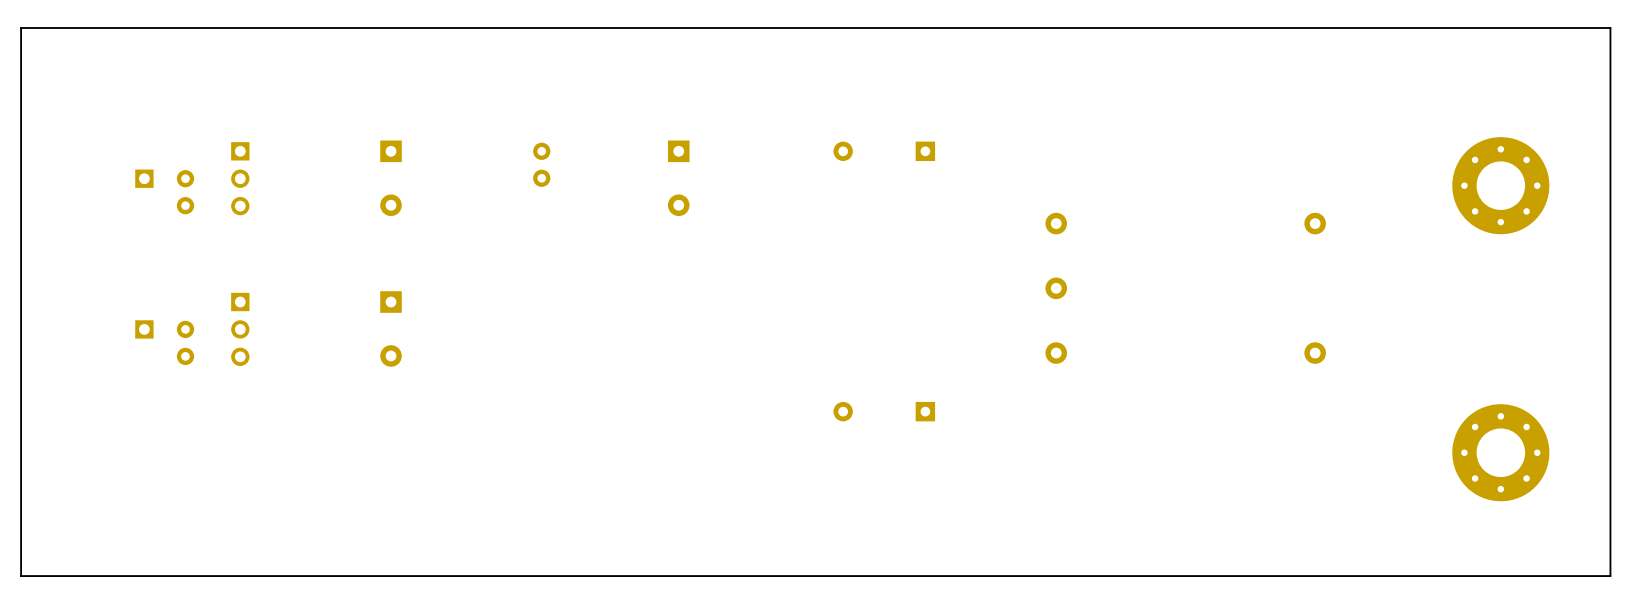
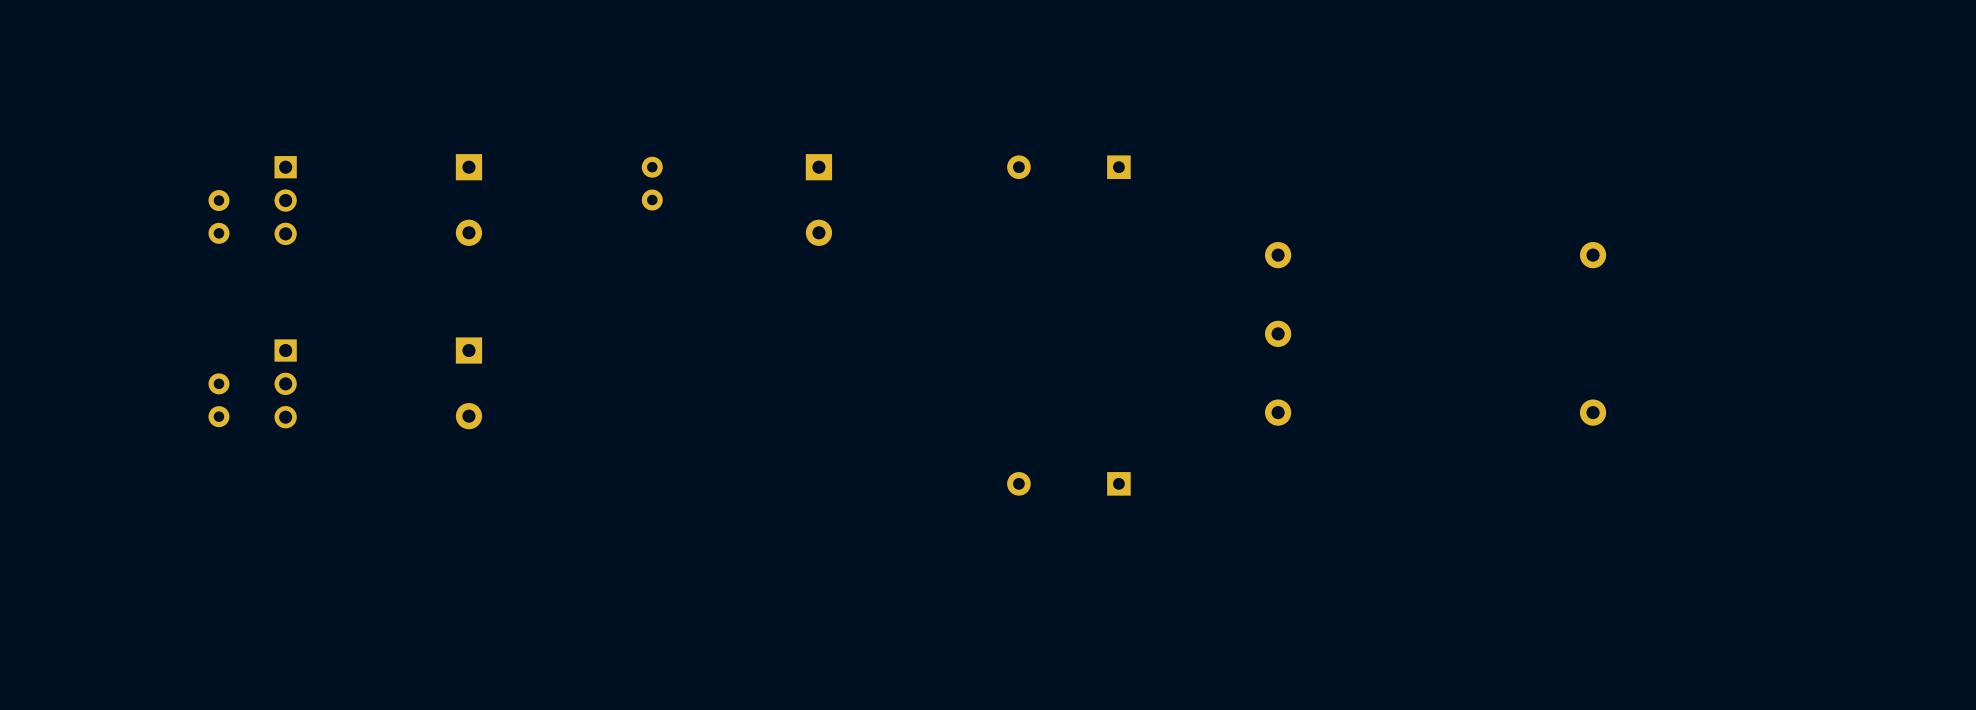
board edge: (1610, 27) (1610, 576) (21, 576) (21, 27) (1610, 27) -> none
part: (144, 178) -> none
part: (1500, 185) -> none
part: (144, 329) -> none
part: (1500, 452) -> none

